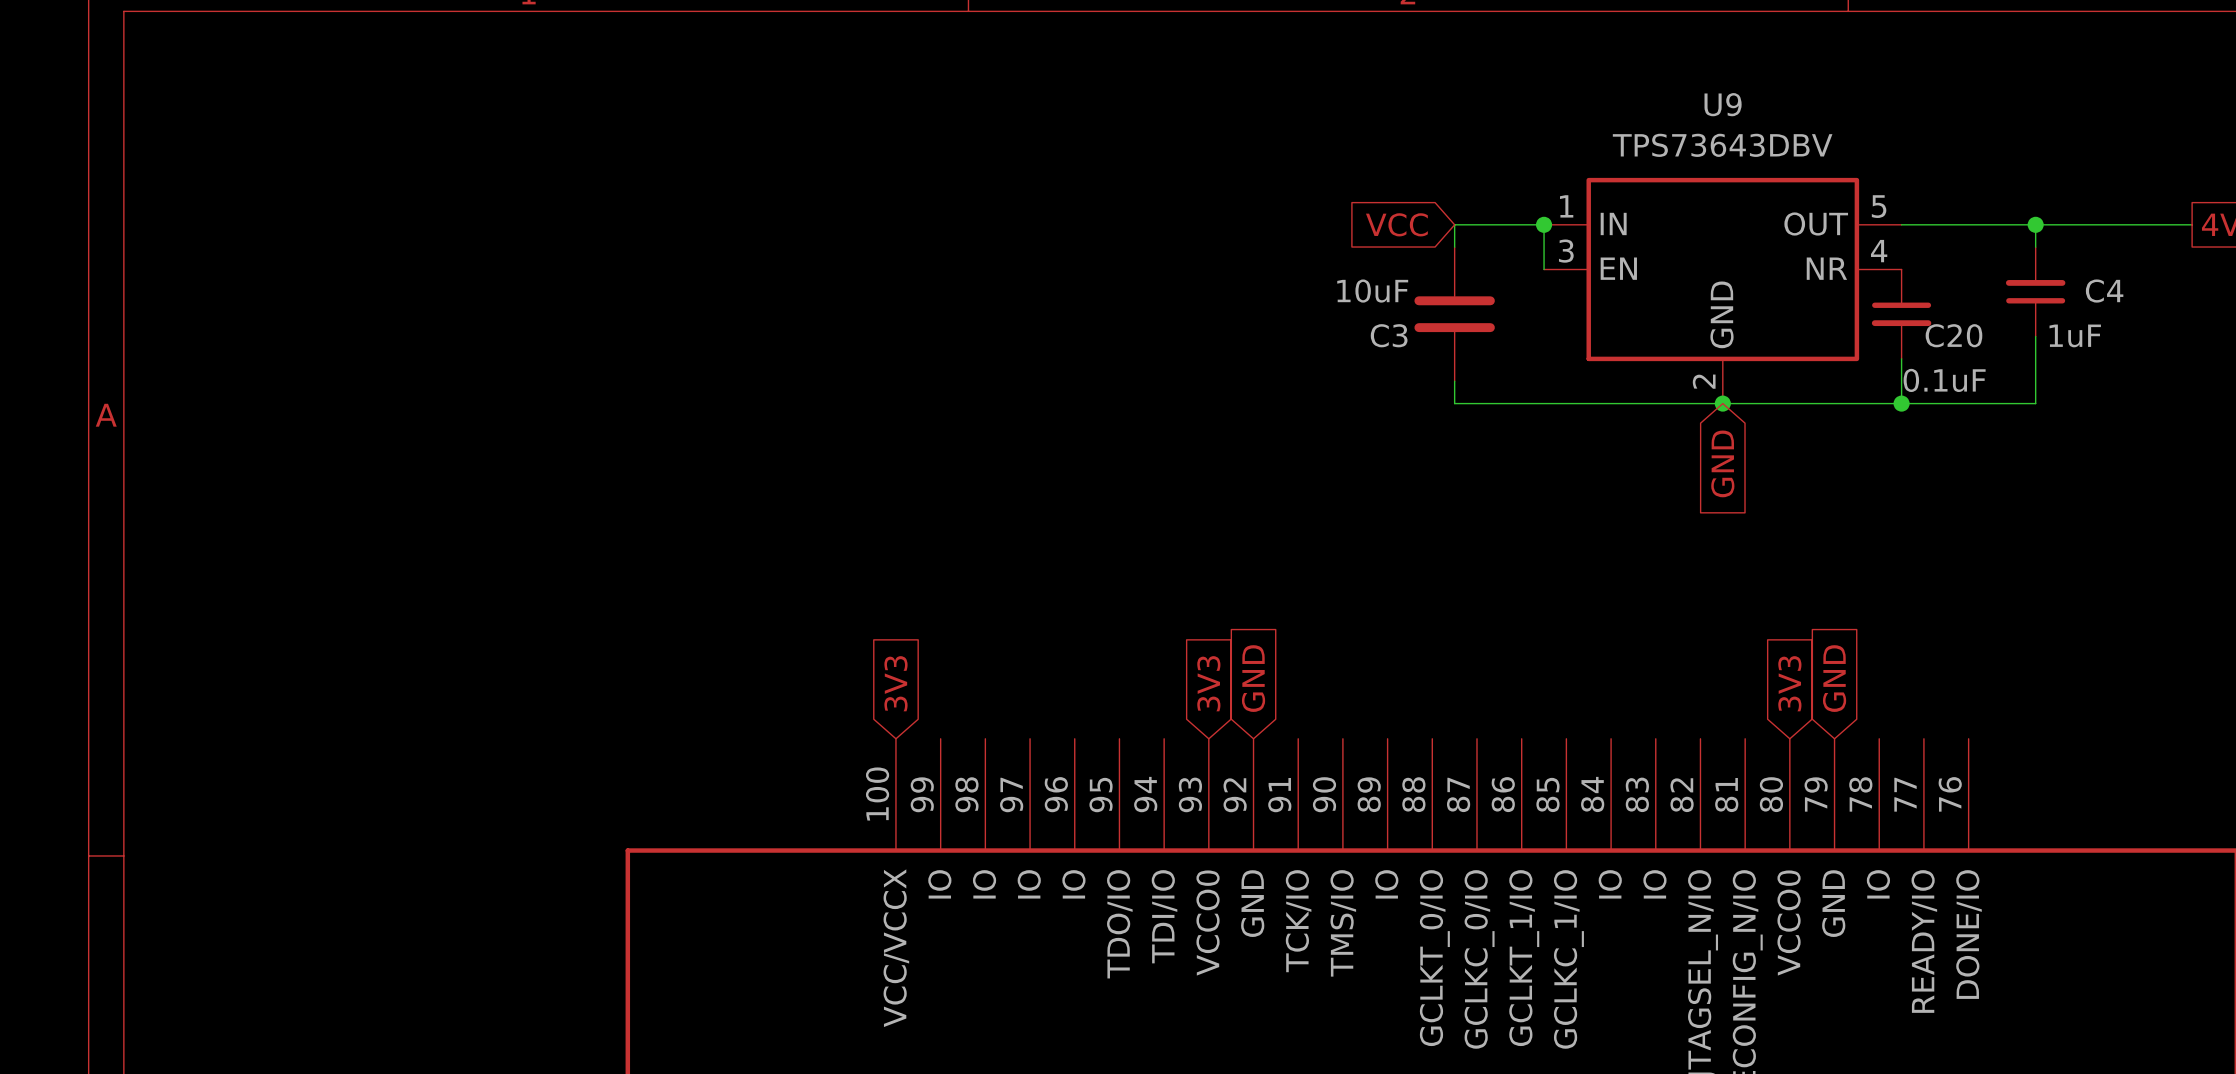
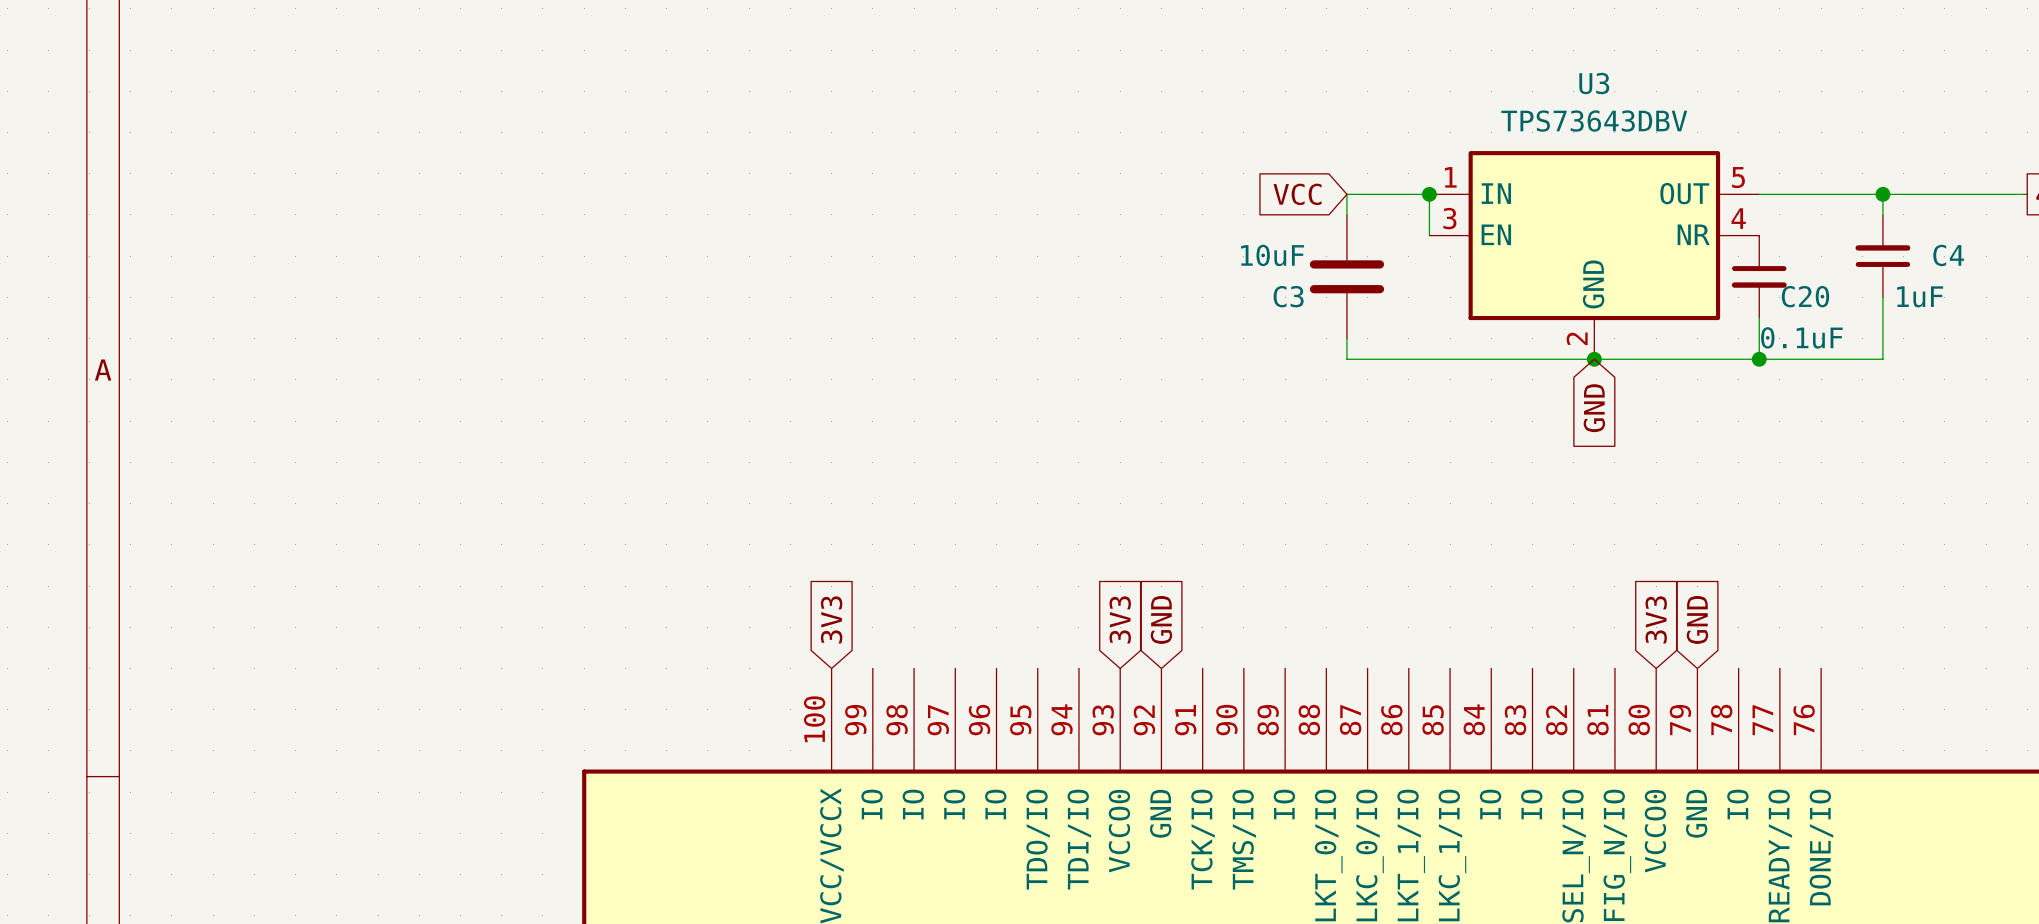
U9 name: U9 (1723, 104) -> U3 (1594, 83)

